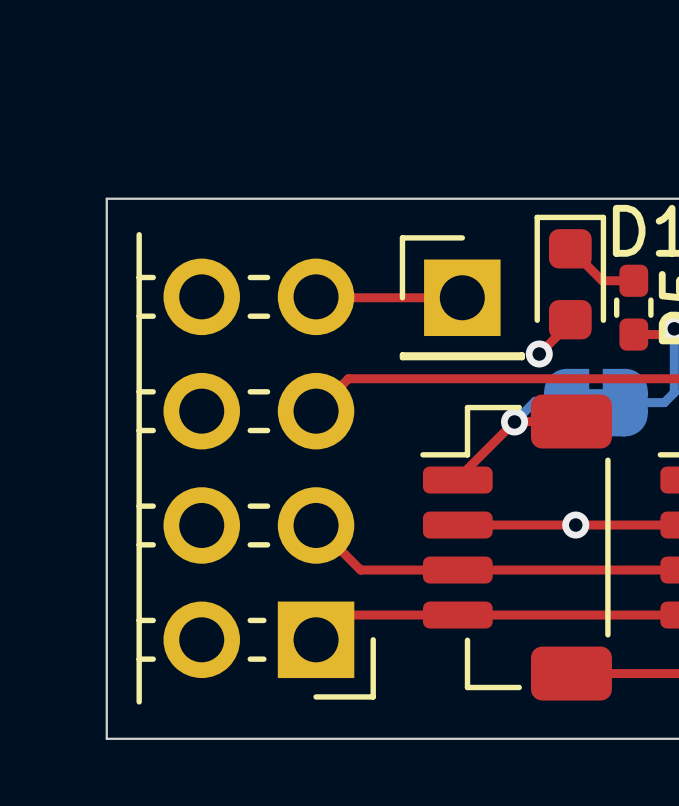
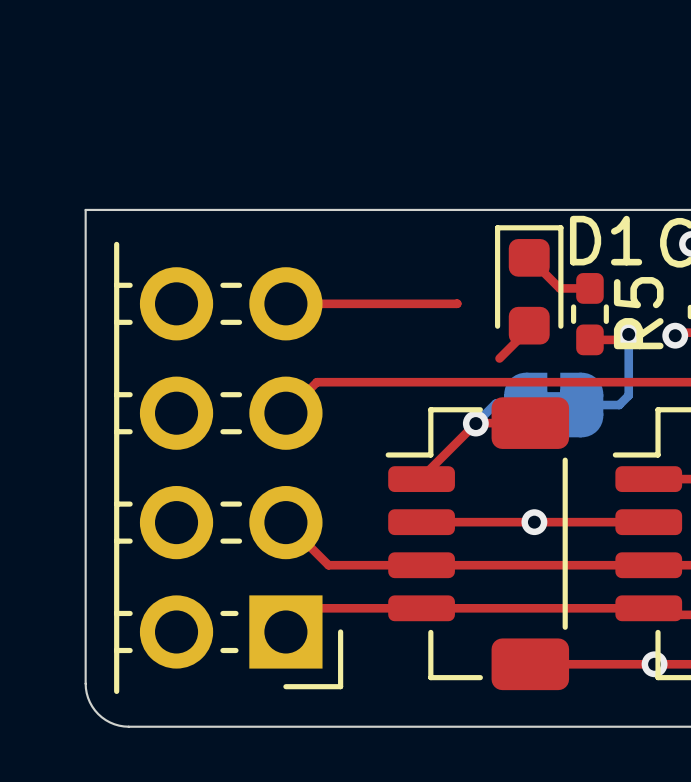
top track: (316, 297) (462, 297) -> (285, 303) (457, 303)
part: (462, 297) -> none
via: (539, 354) -> none
board edge: (106, 693) (106, 738) (151, 738) -> (85, 683) (88, 697) (98, 714) (114, 724) (128, 726)

